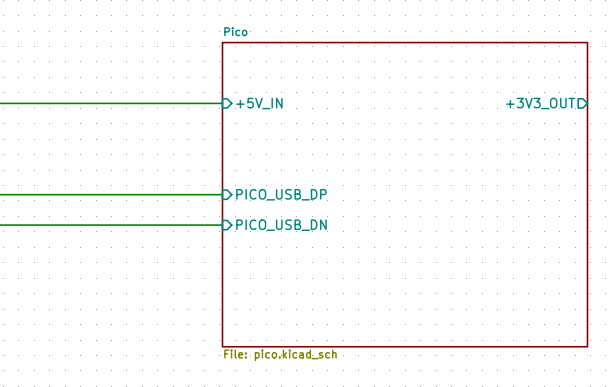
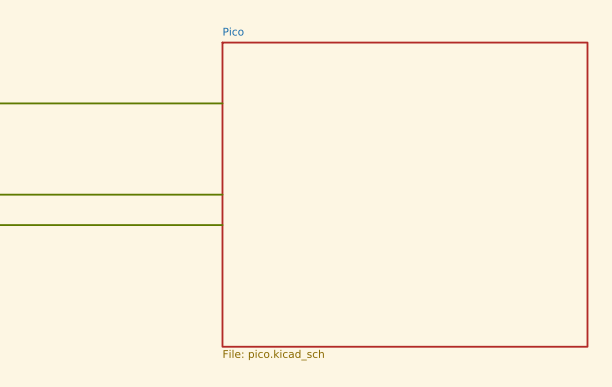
sheet pin: +5V_IN (259, 103) -> none
sheet pin: +3V3_OUT (540, 103) -> none
sheet pin: PICO_USB_DP (281, 194) -> none
sheet pin: PICO_USB_DN (281, 225) -> none

